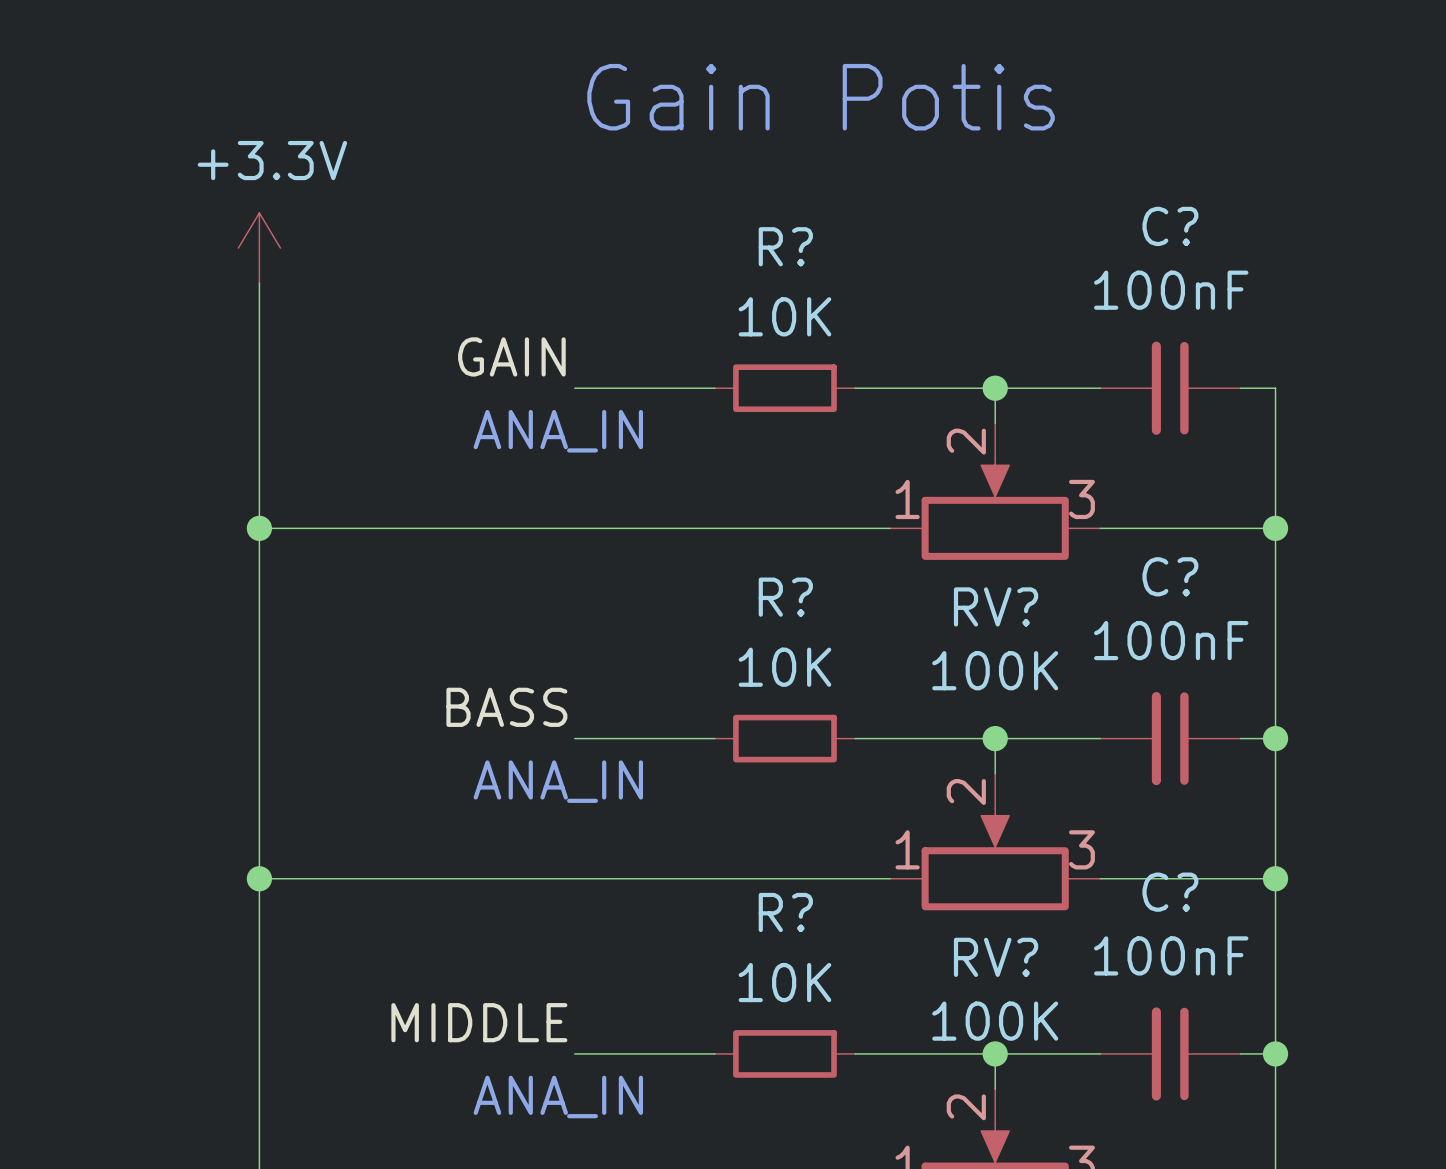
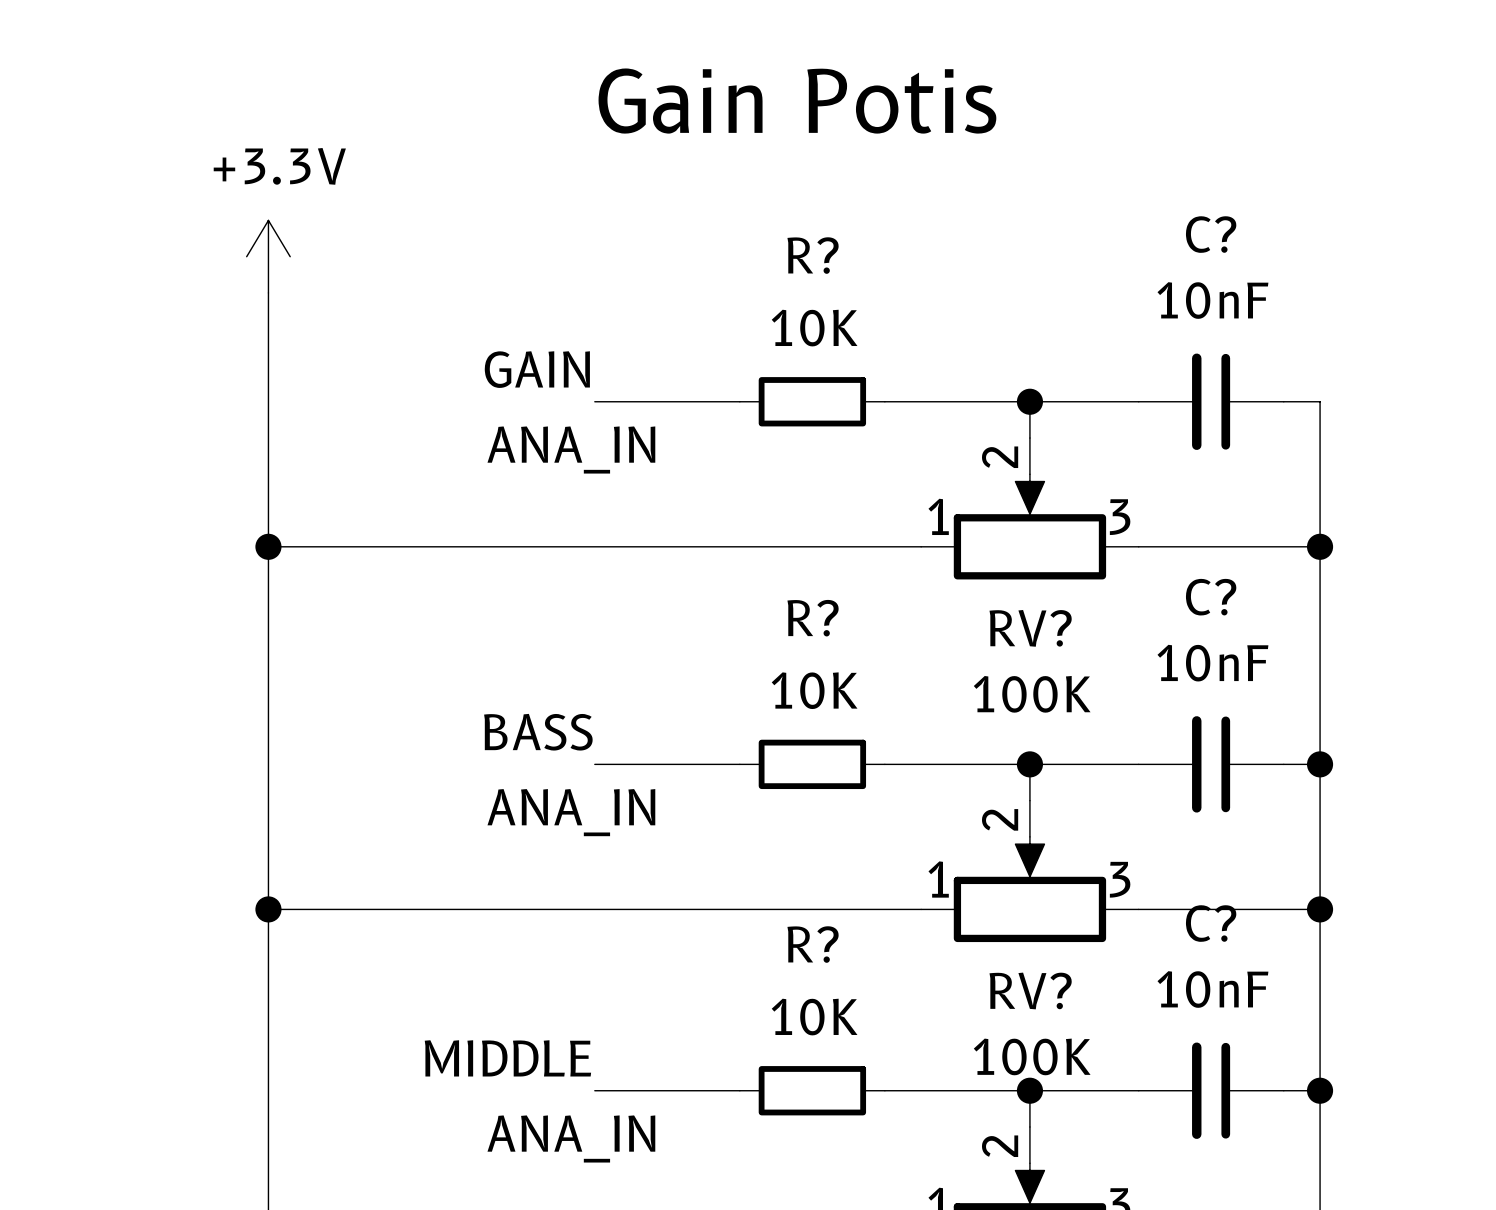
C? value: 100nF (1171, 290) -> 10nF (1212, 300)
C? value: 100nF (1171, 640) -> 10nF (1212, 663)
C? value: 100nF (1171, 955) -> 10nF (1212, 989)

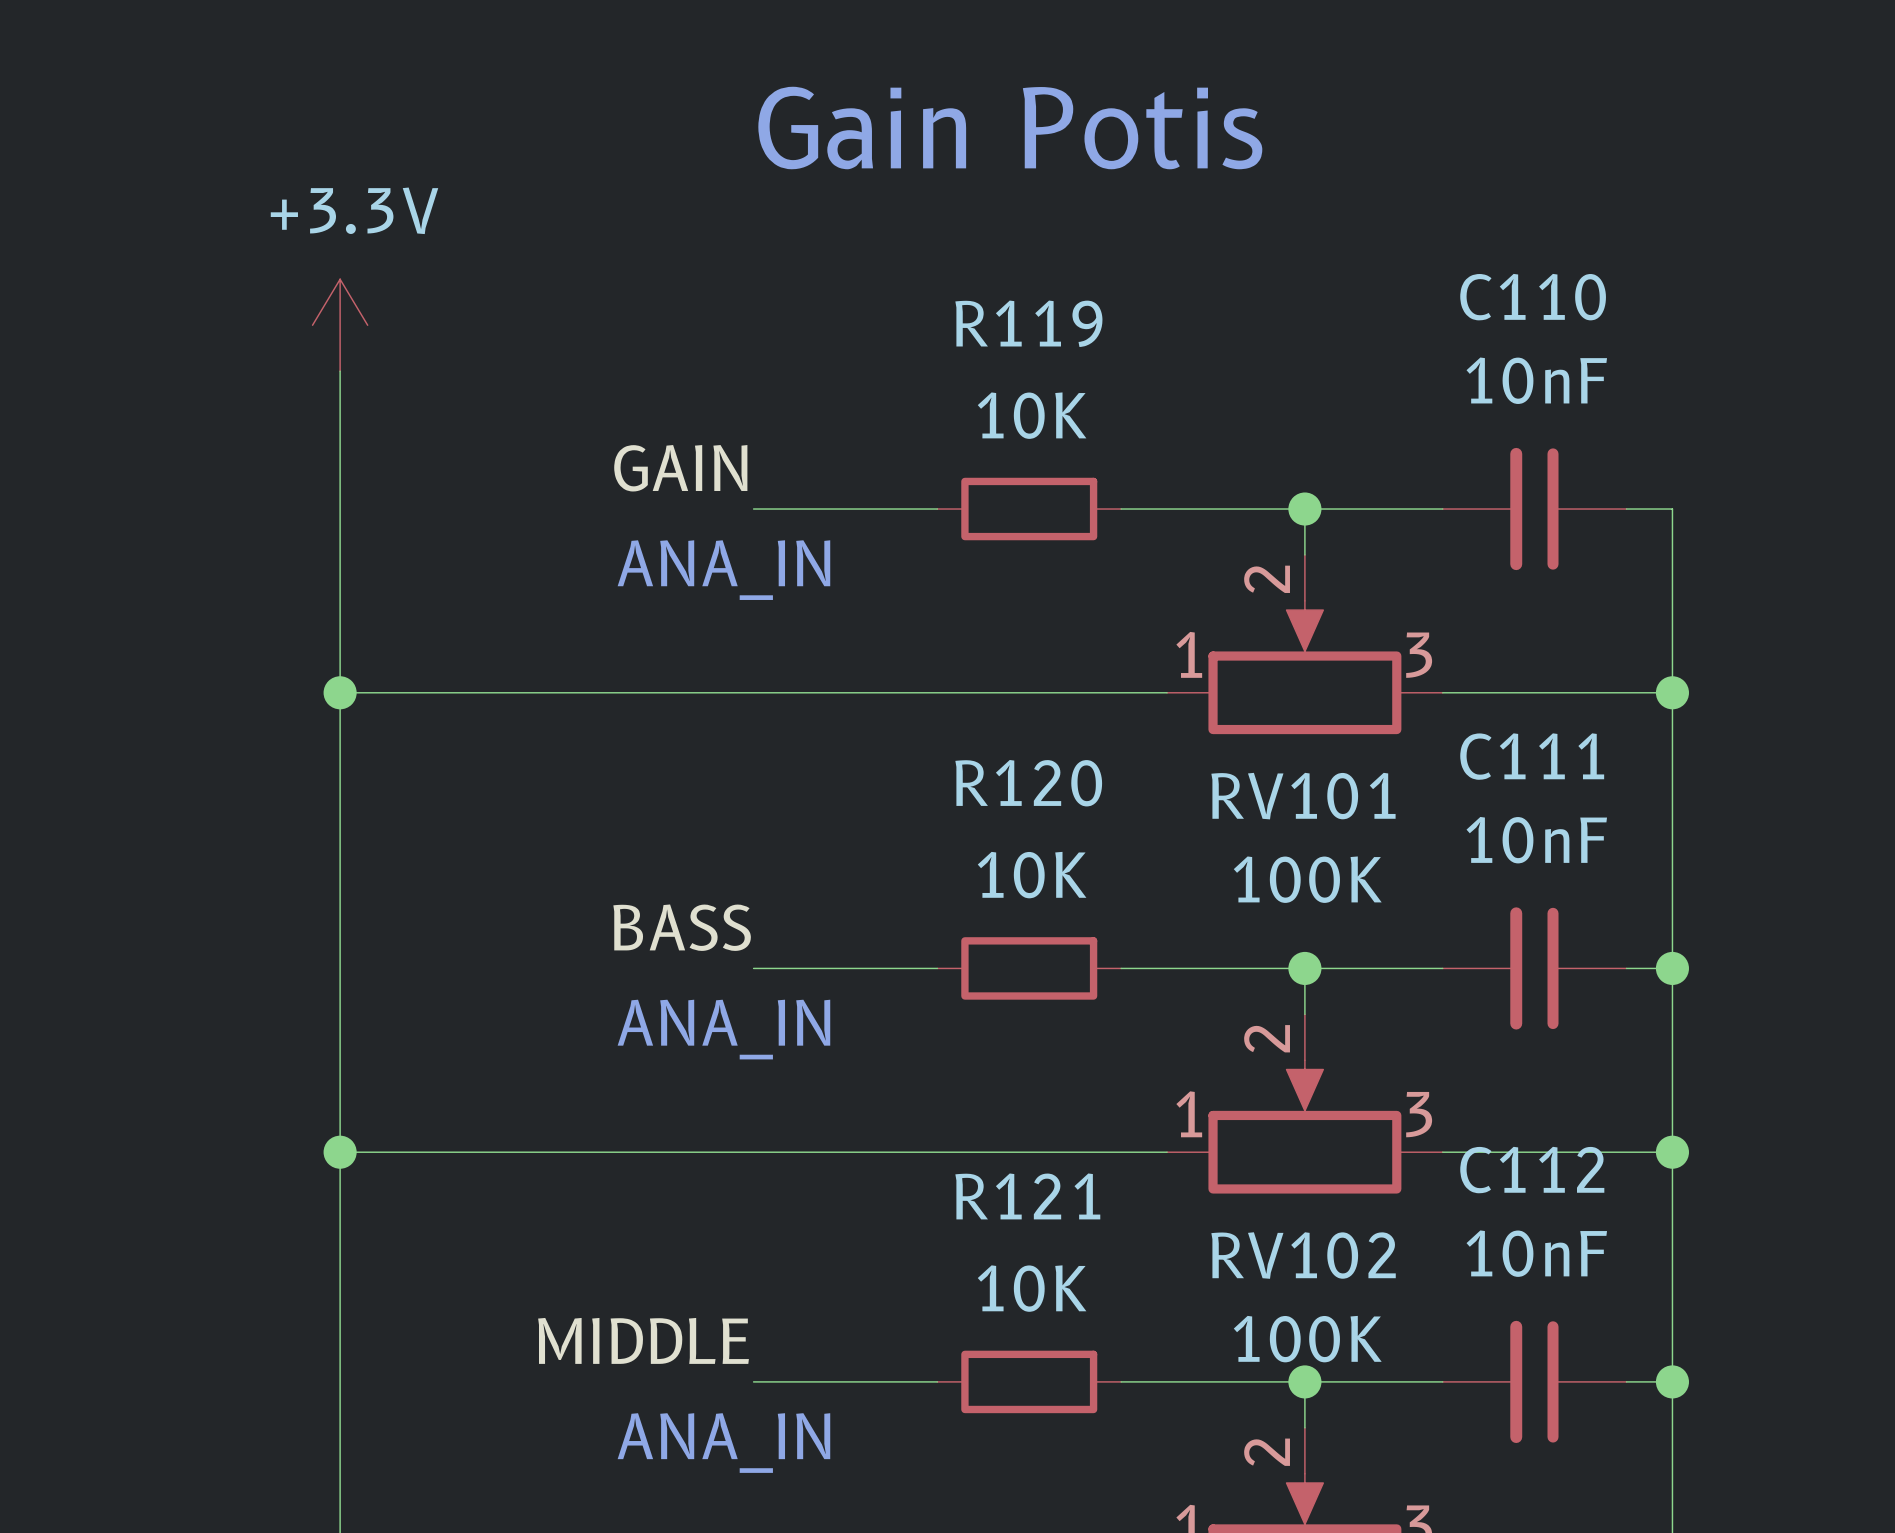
C? name: C? (1211, 234) -> C110 (1533, 297)
R? name: R? (813, 255) -> R119 (1028, 323)
C? name: C? (1211, 597) -> C111 (1532, 756)
R? name: R? (813, 618) -> R120 (1028, 783)
RV? name: RV? (1030, 628) -> RV101 (1303, 796)
C? name: C? (1211, 923) -> C112 (1532, 1170)
R? name: R? (813, 944) -> R121 (1027, 1196)
RV? name: RV? (1030, 990) -> RV102 (1303, 1255)

